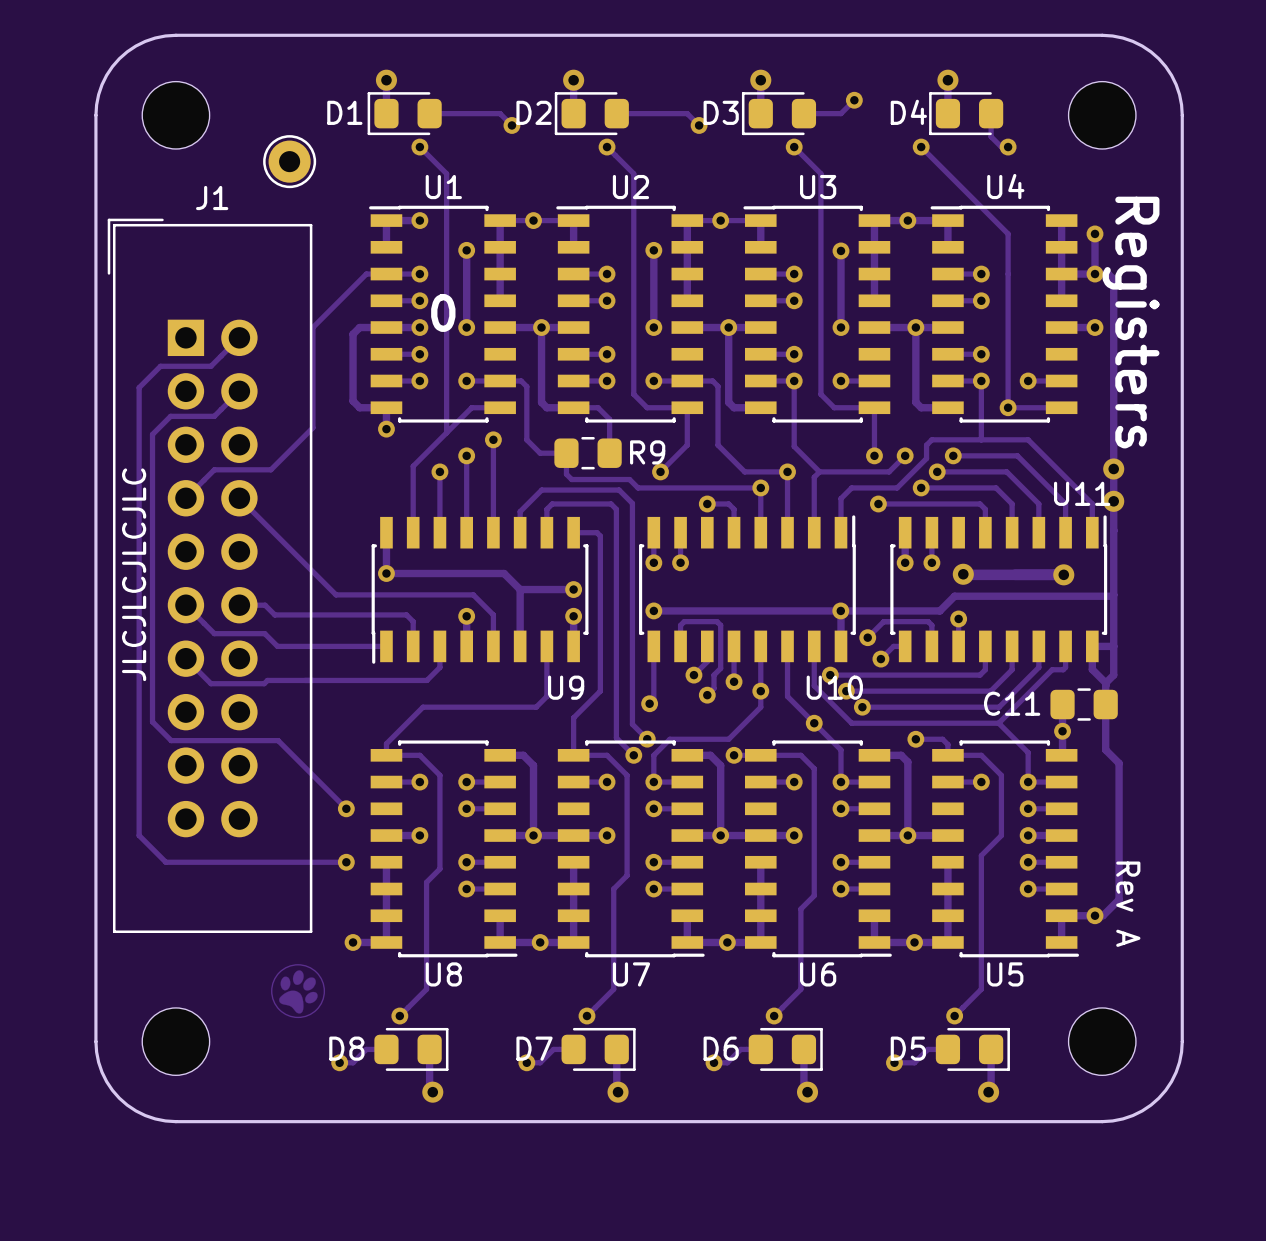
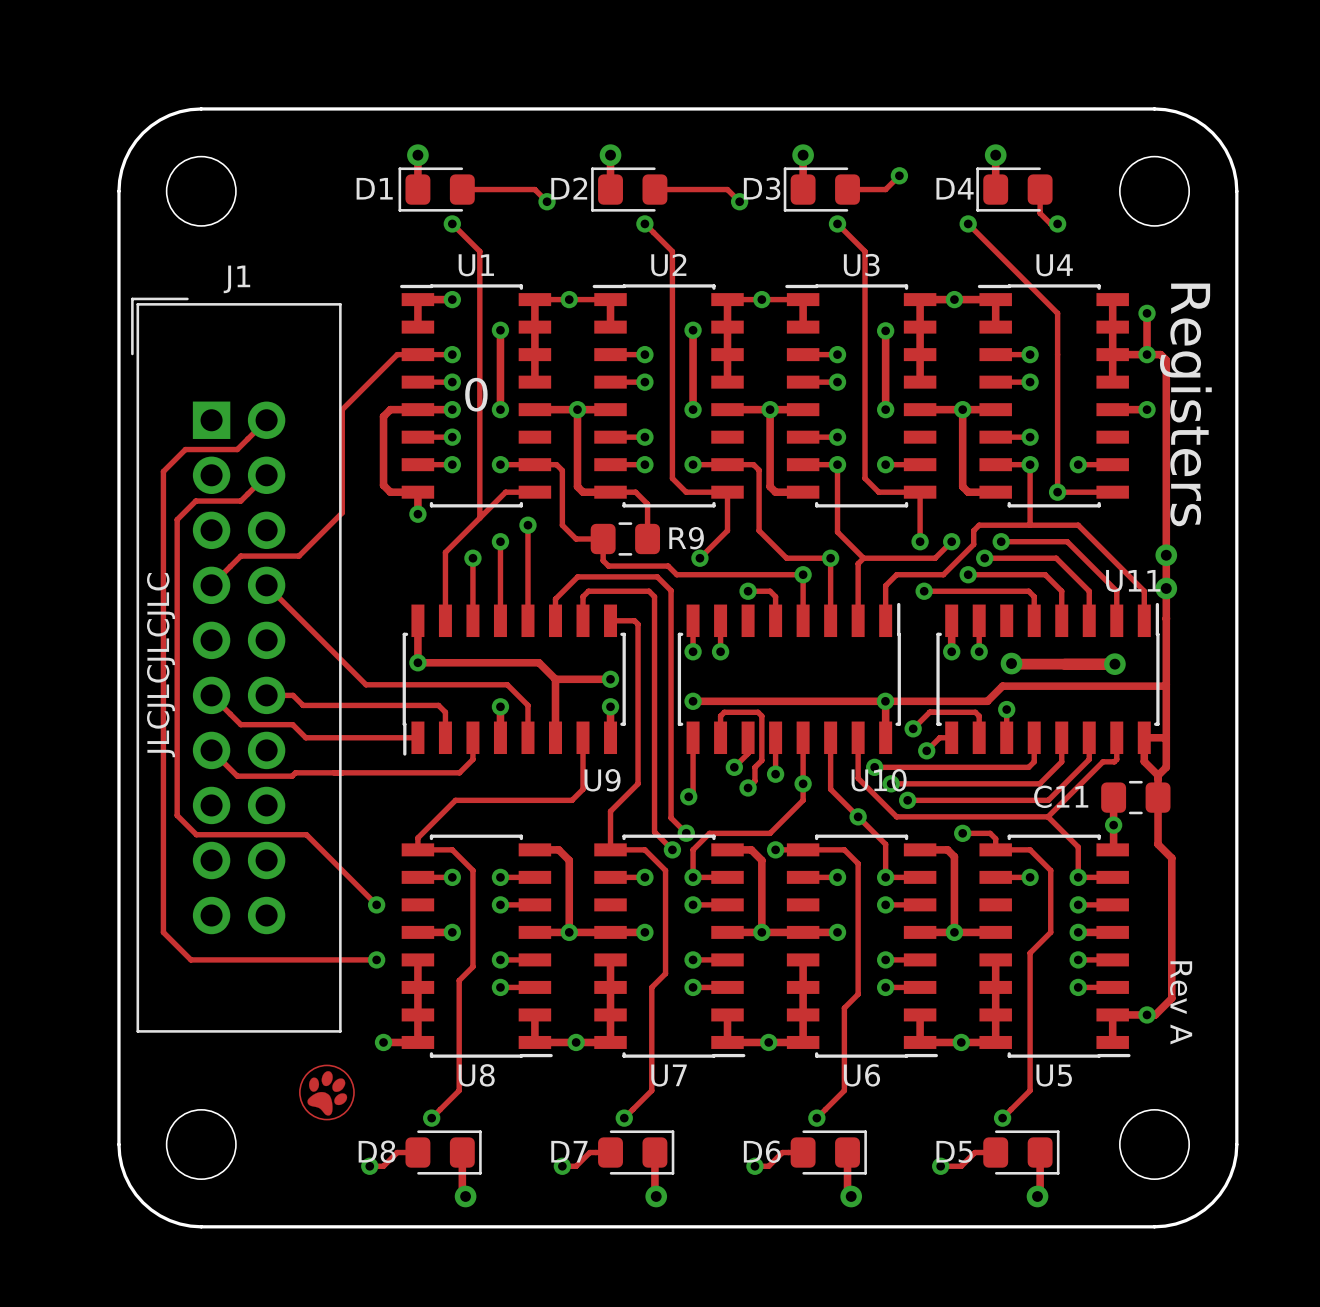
part: (289, 161) -> none

